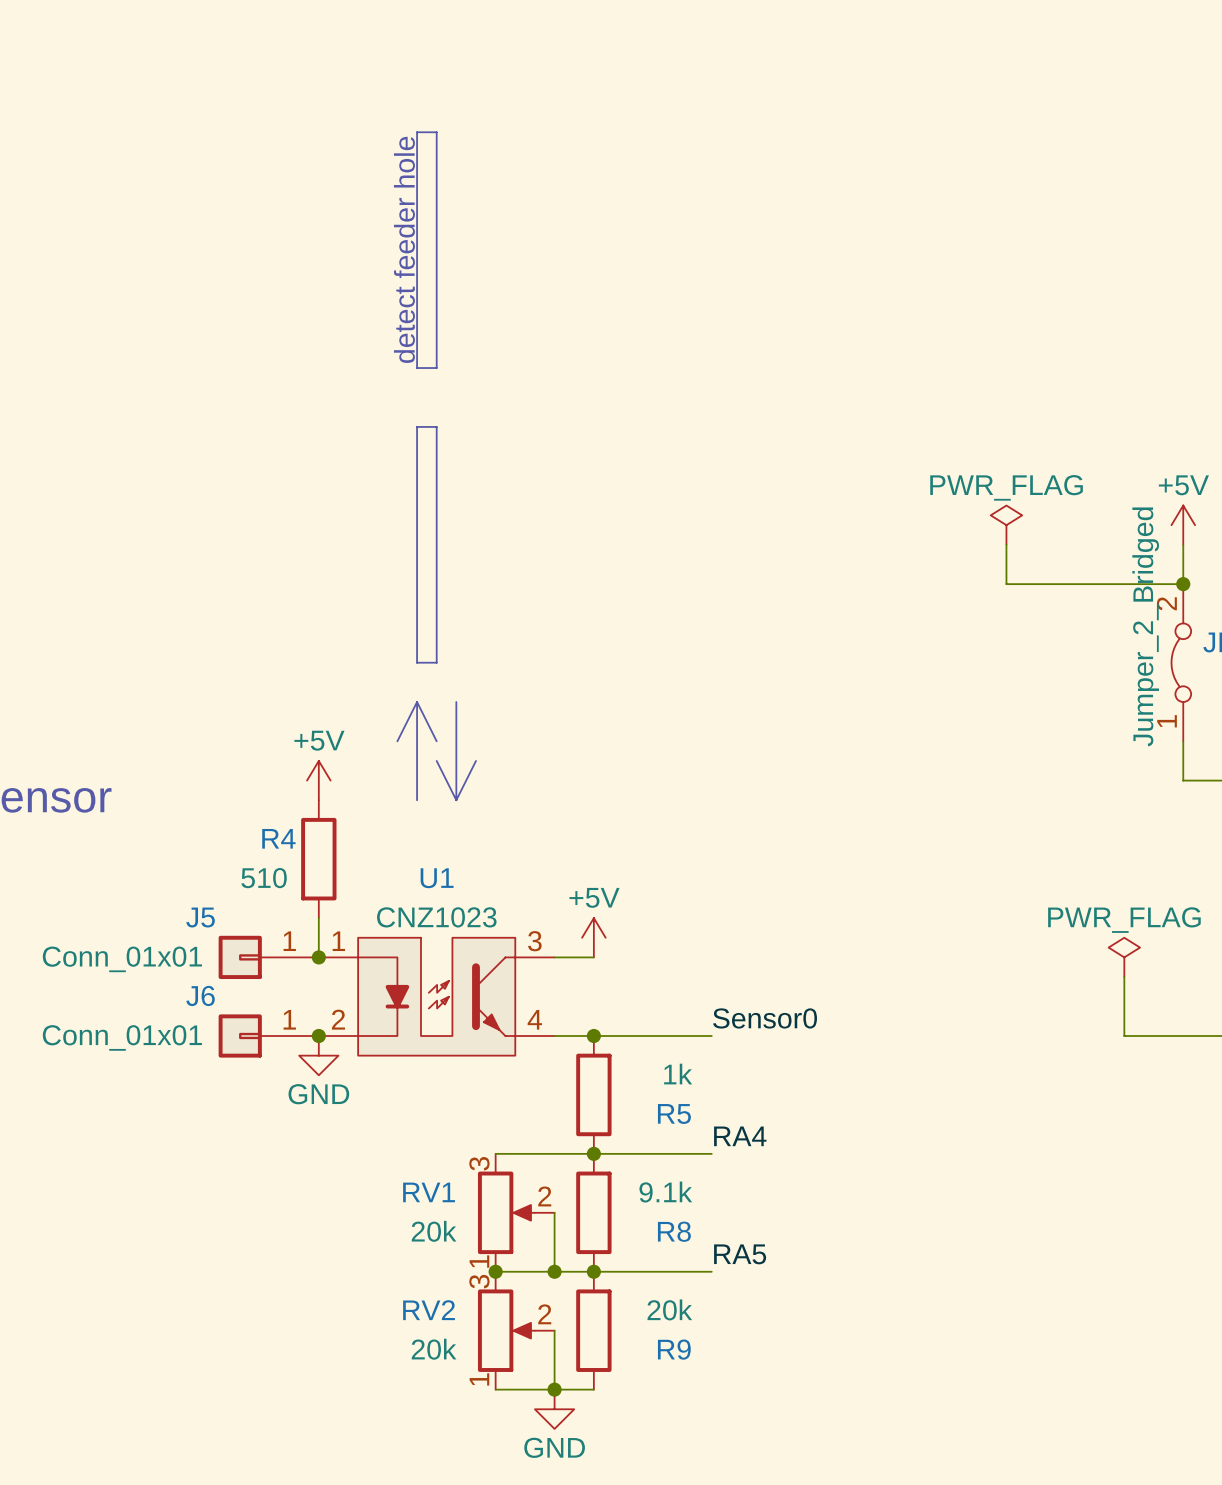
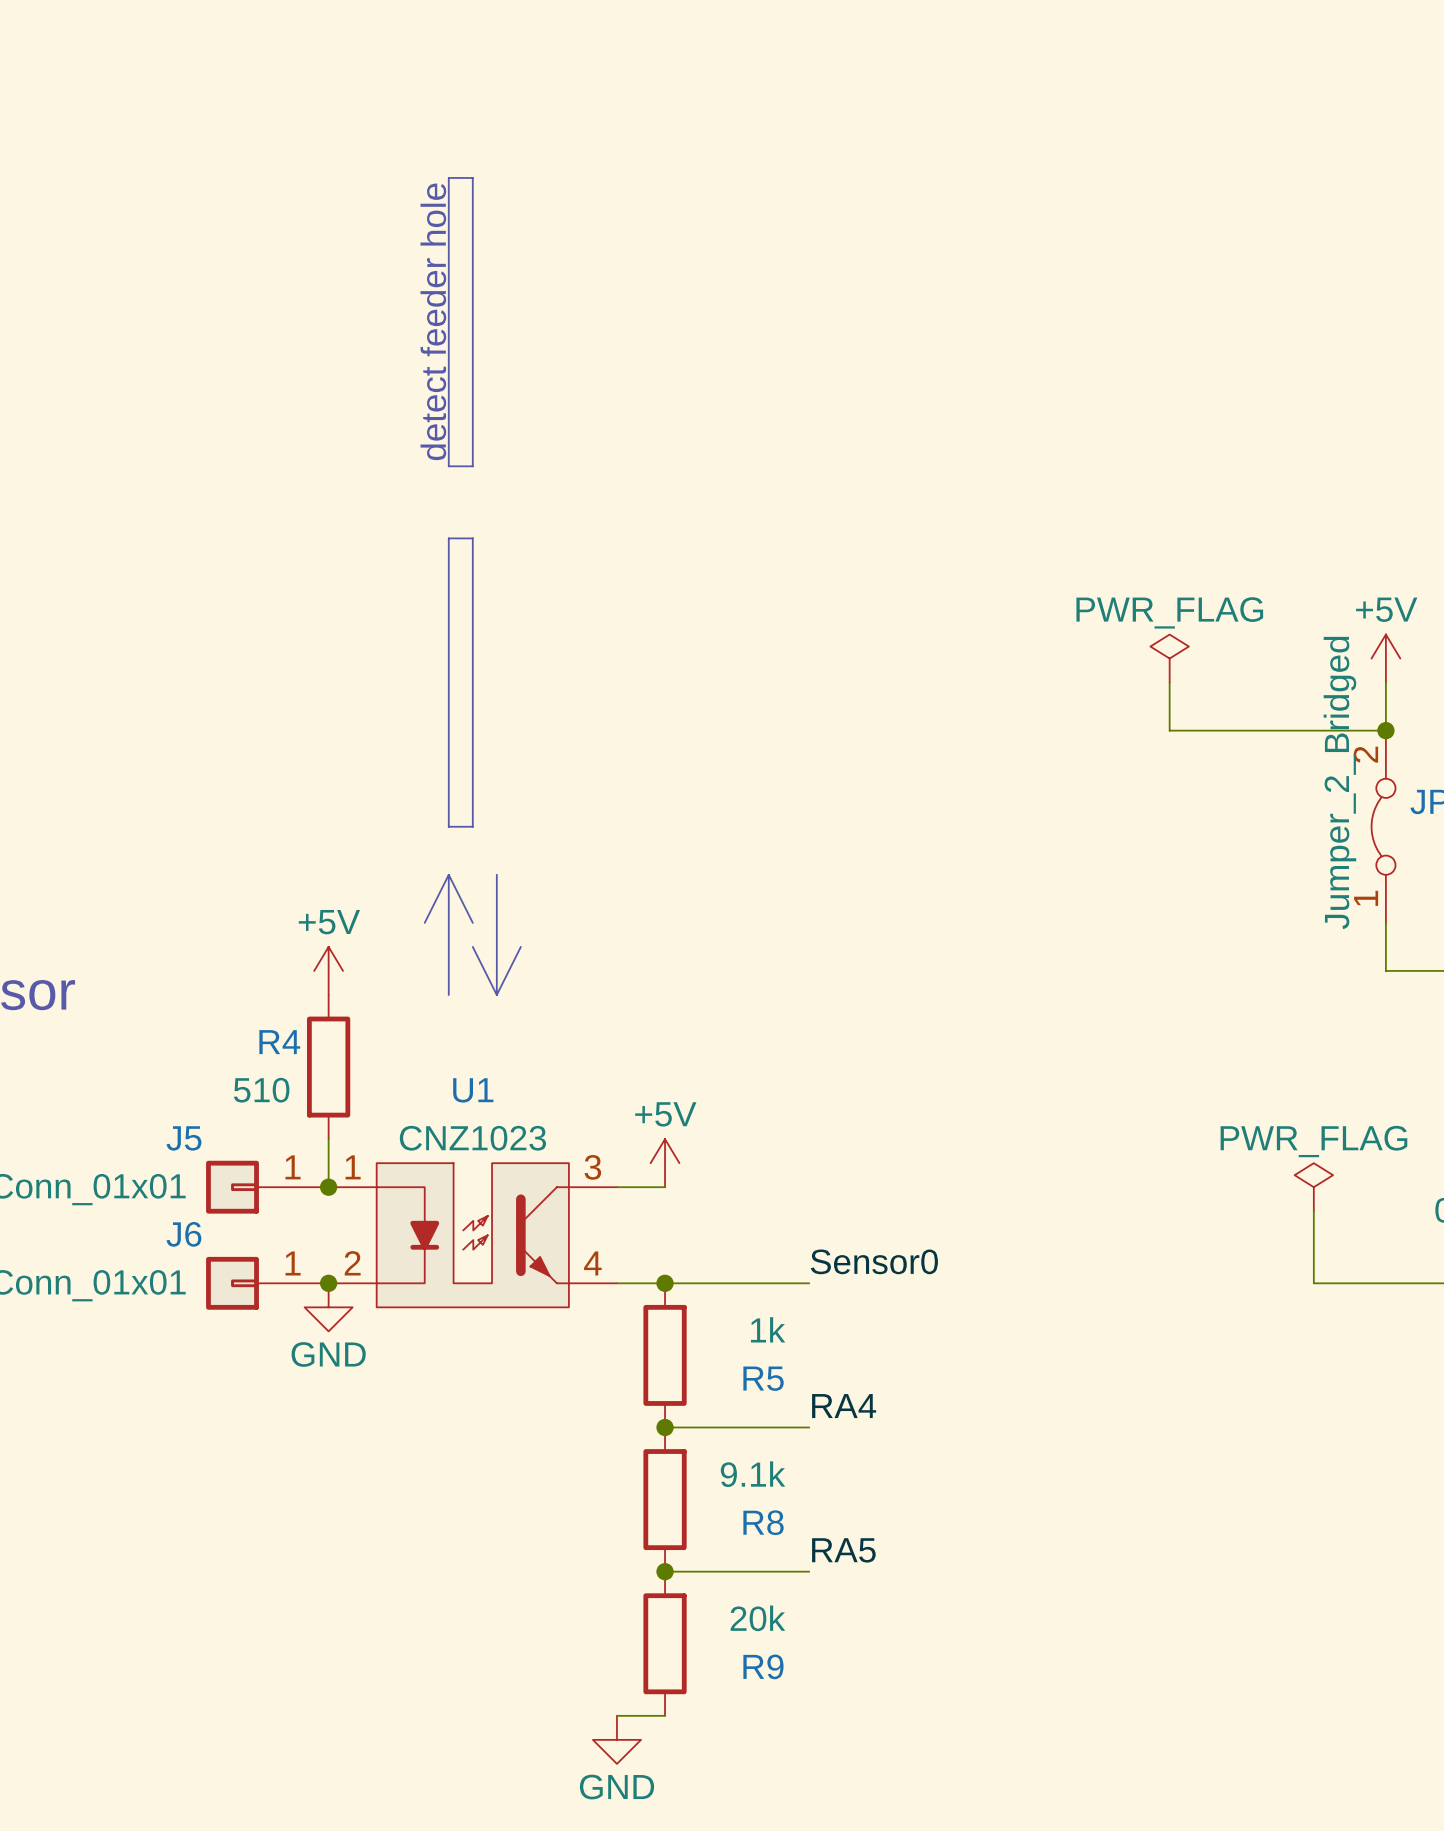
wire: (495, 1153) (593, 1153) -> none
RV1: 20k (516, 1212) -> none
wire: (554, 1212) (554, 1271) -> none
wire: (495, 1271) (593, 1271) -> none
junction: (495, 1271) -> none
junction: (554, 1271) -> none
RV2: 20k (516, 1330) -> none
wire: (554, 1330) (554, 1389) (495, 1389) -> none
junction: (554, 1389) -> none

